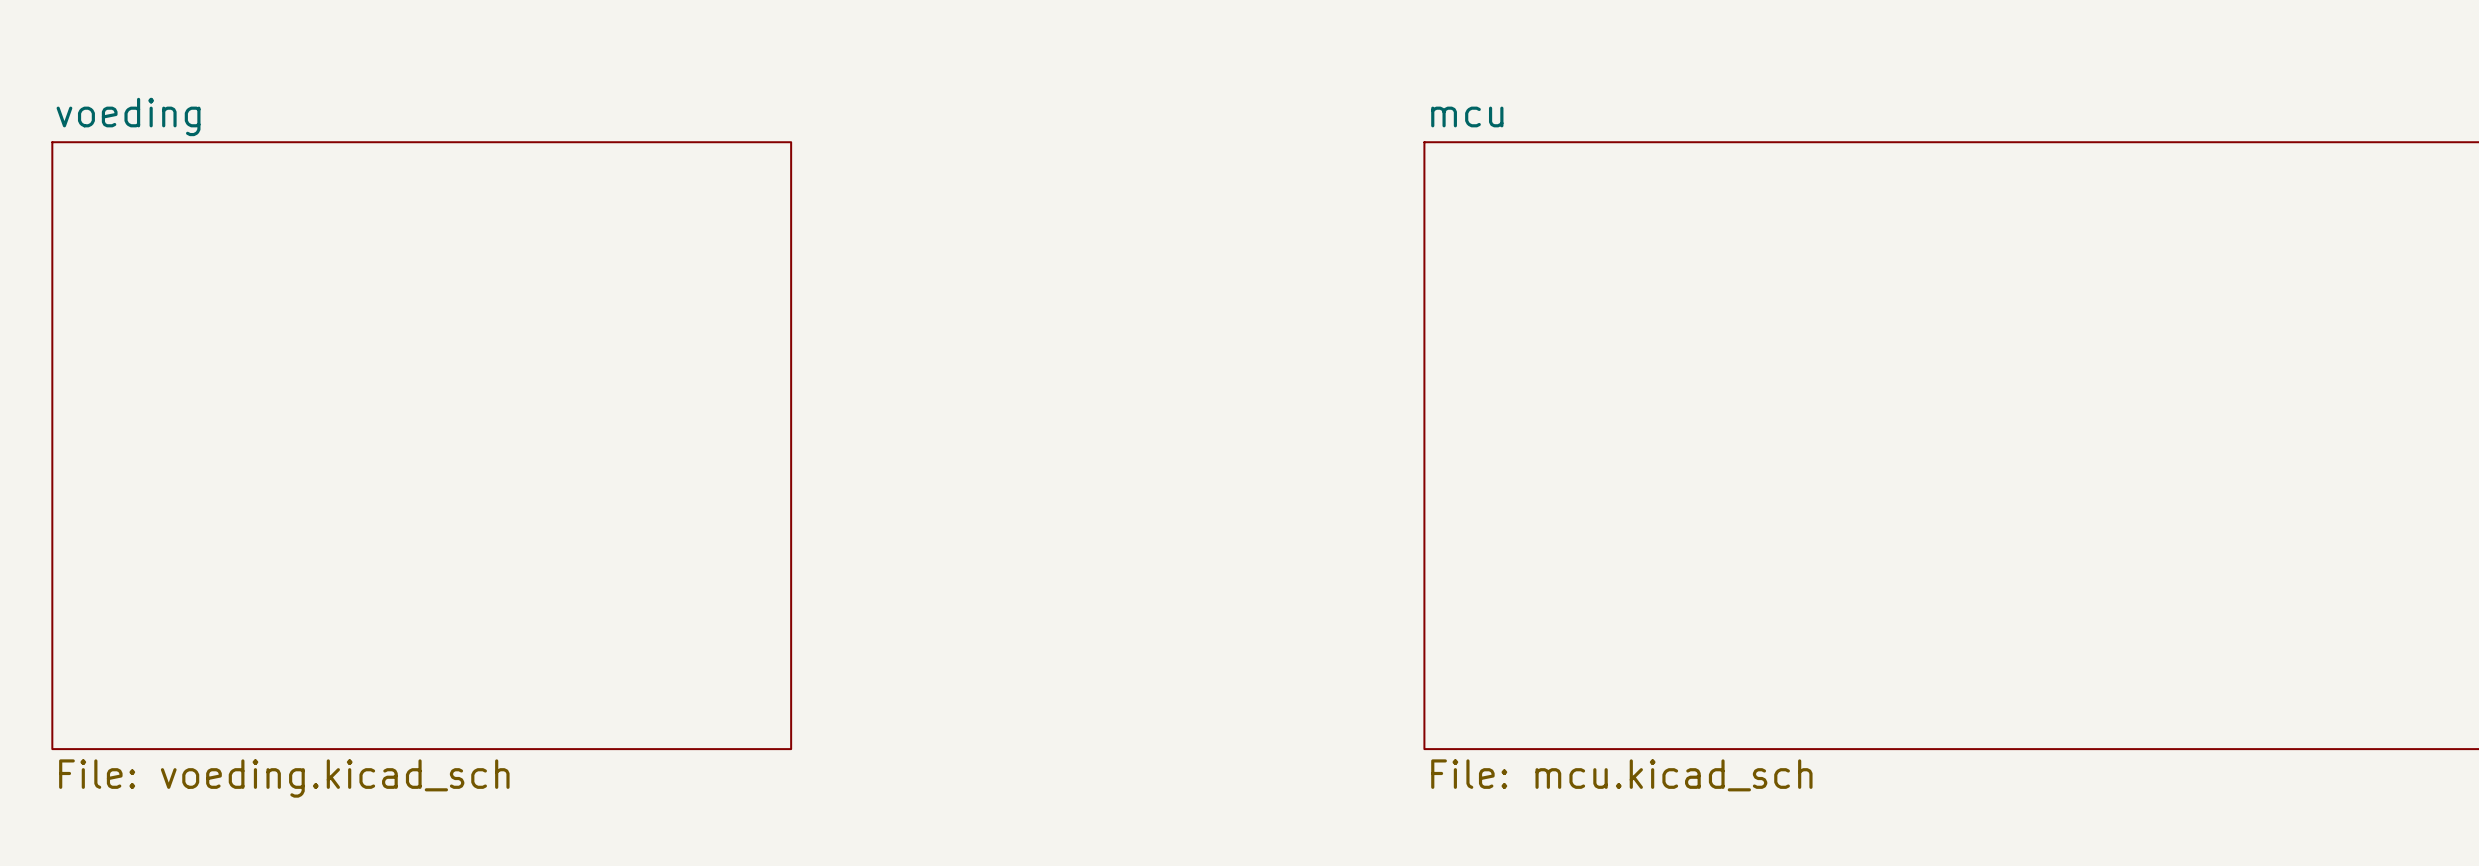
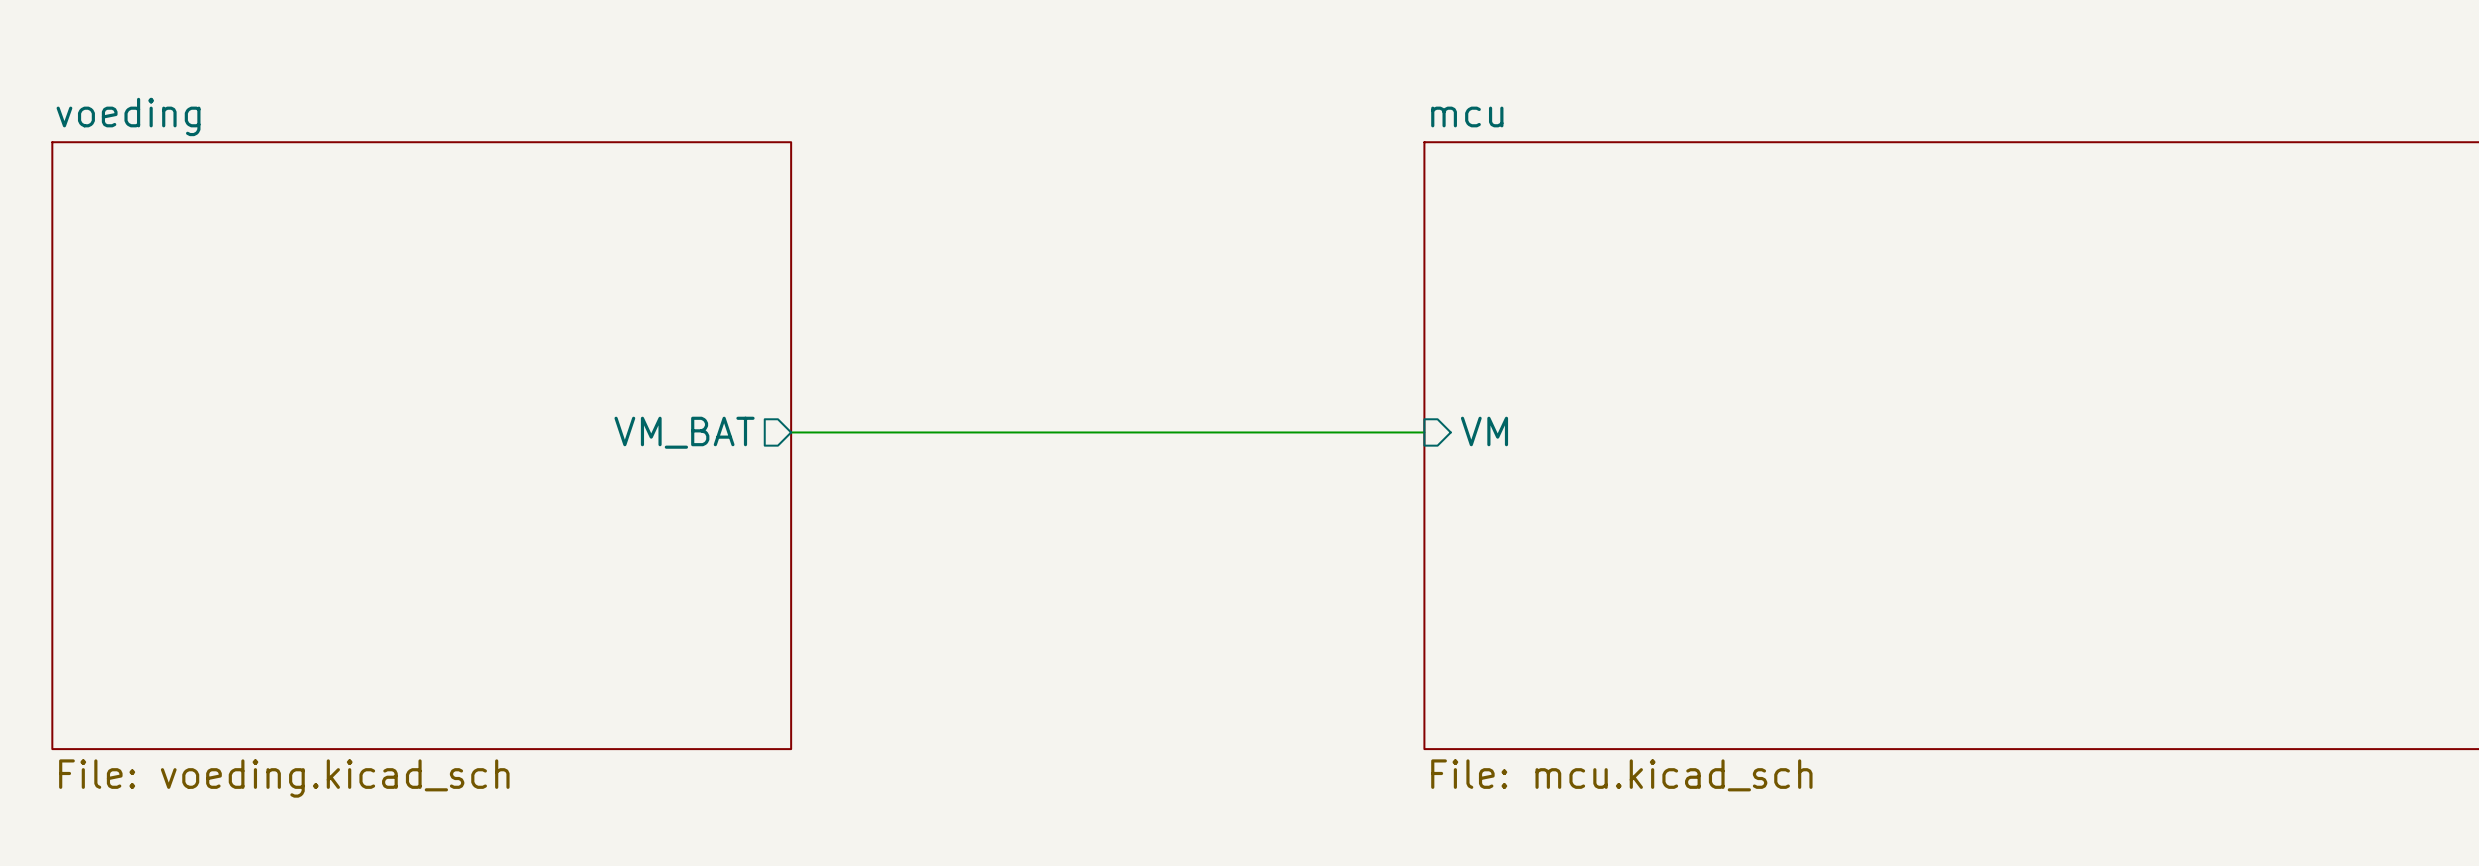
sheet pin: none -> VM (1484, 431)
sheet pin: none -> VM_BAT (684, 432)
wire: none -> (791, 432) (1424, 432)

